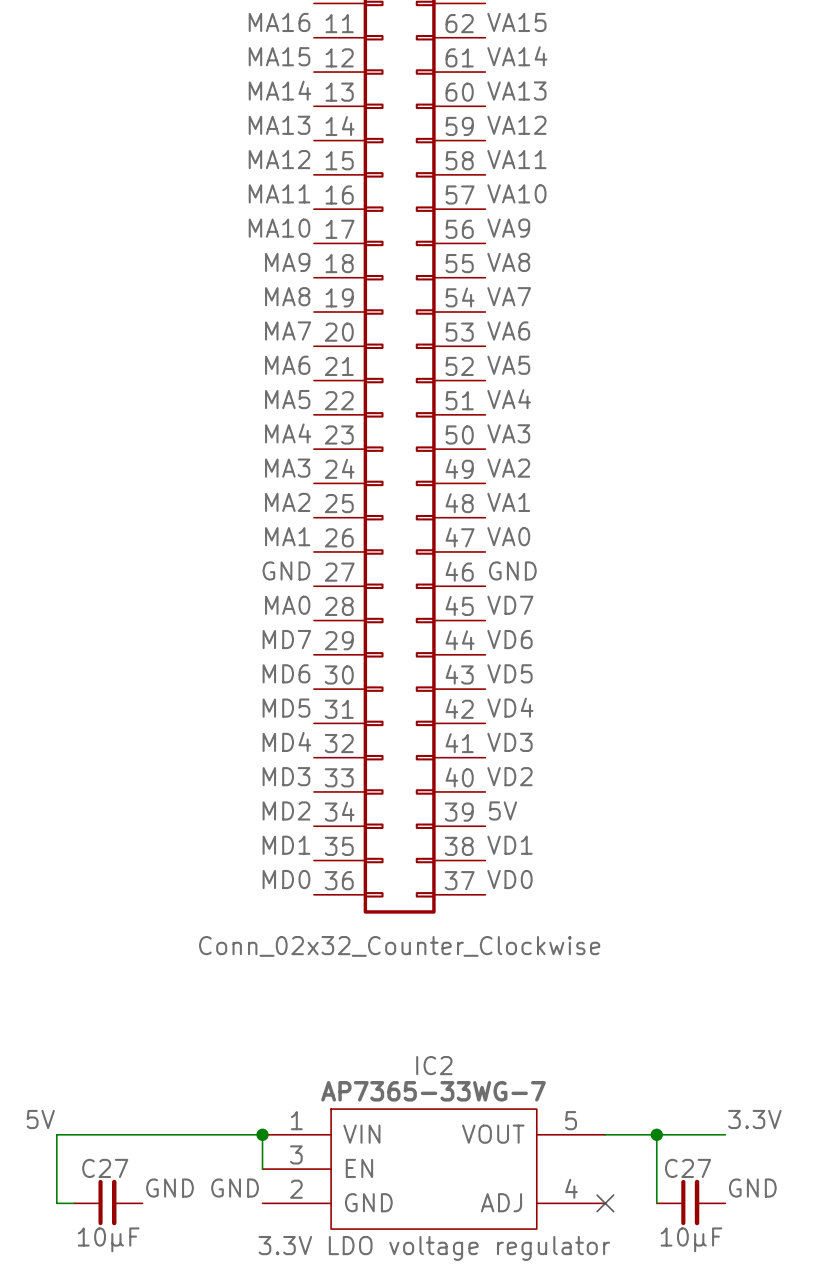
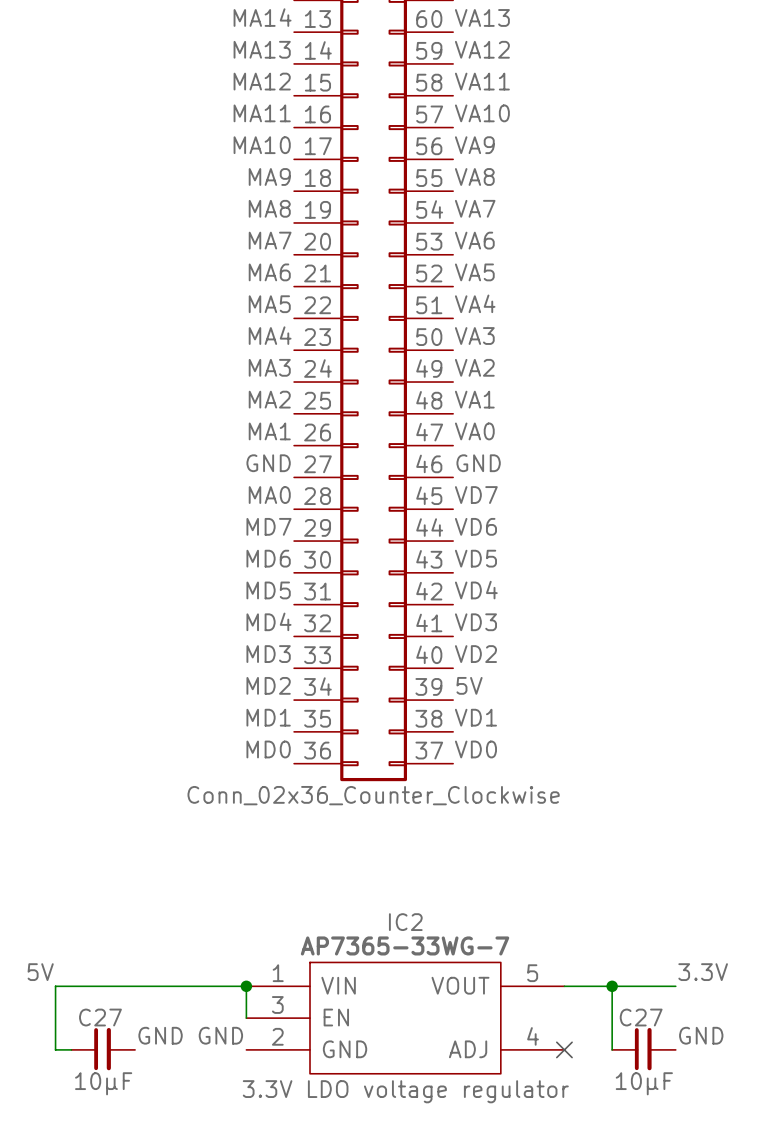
part value: Conn_02x32_Counter_Clockwise (399, 946) -> Conn_02x36_Counter_Clockwise (373, 795)

